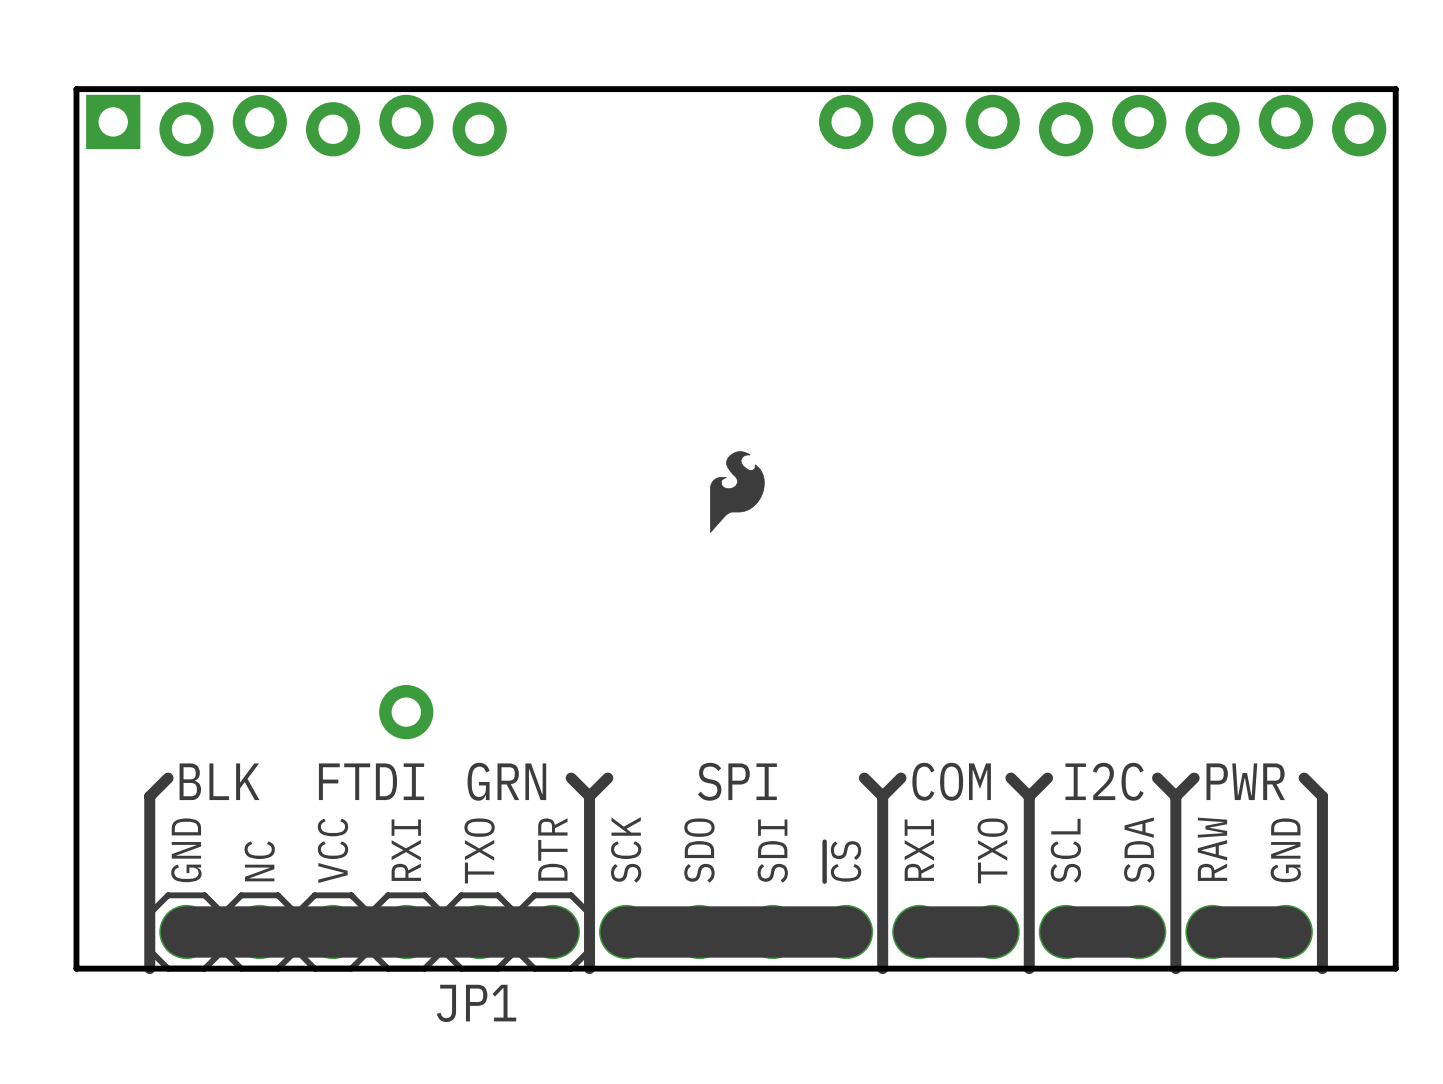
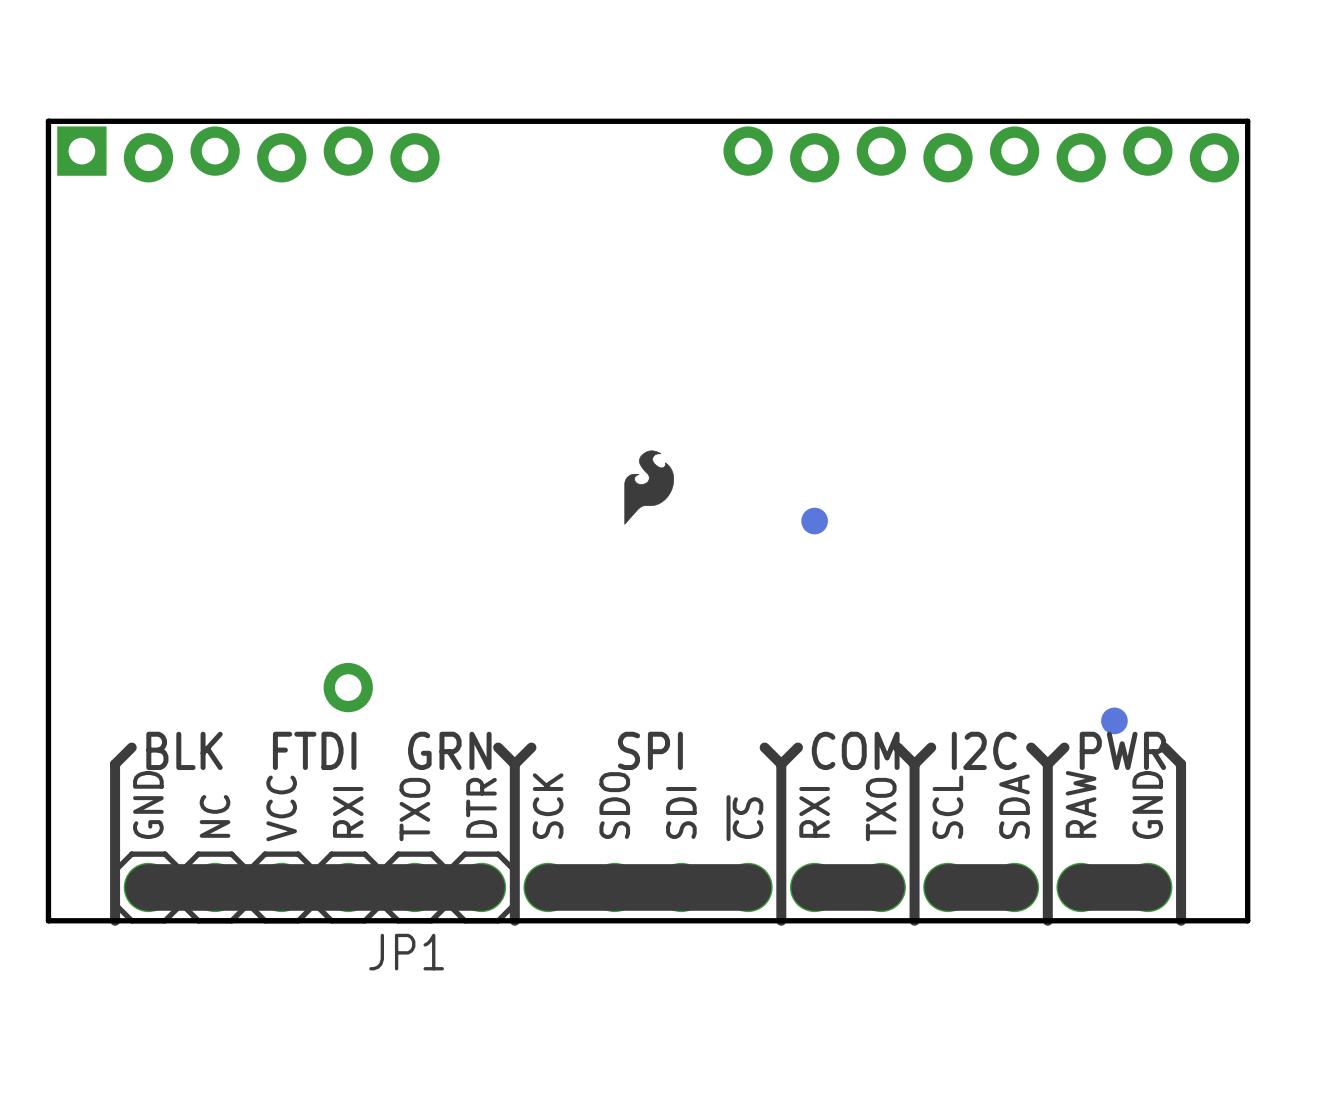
part: none -> (814, 521)
part: none -> (1114, 720)

